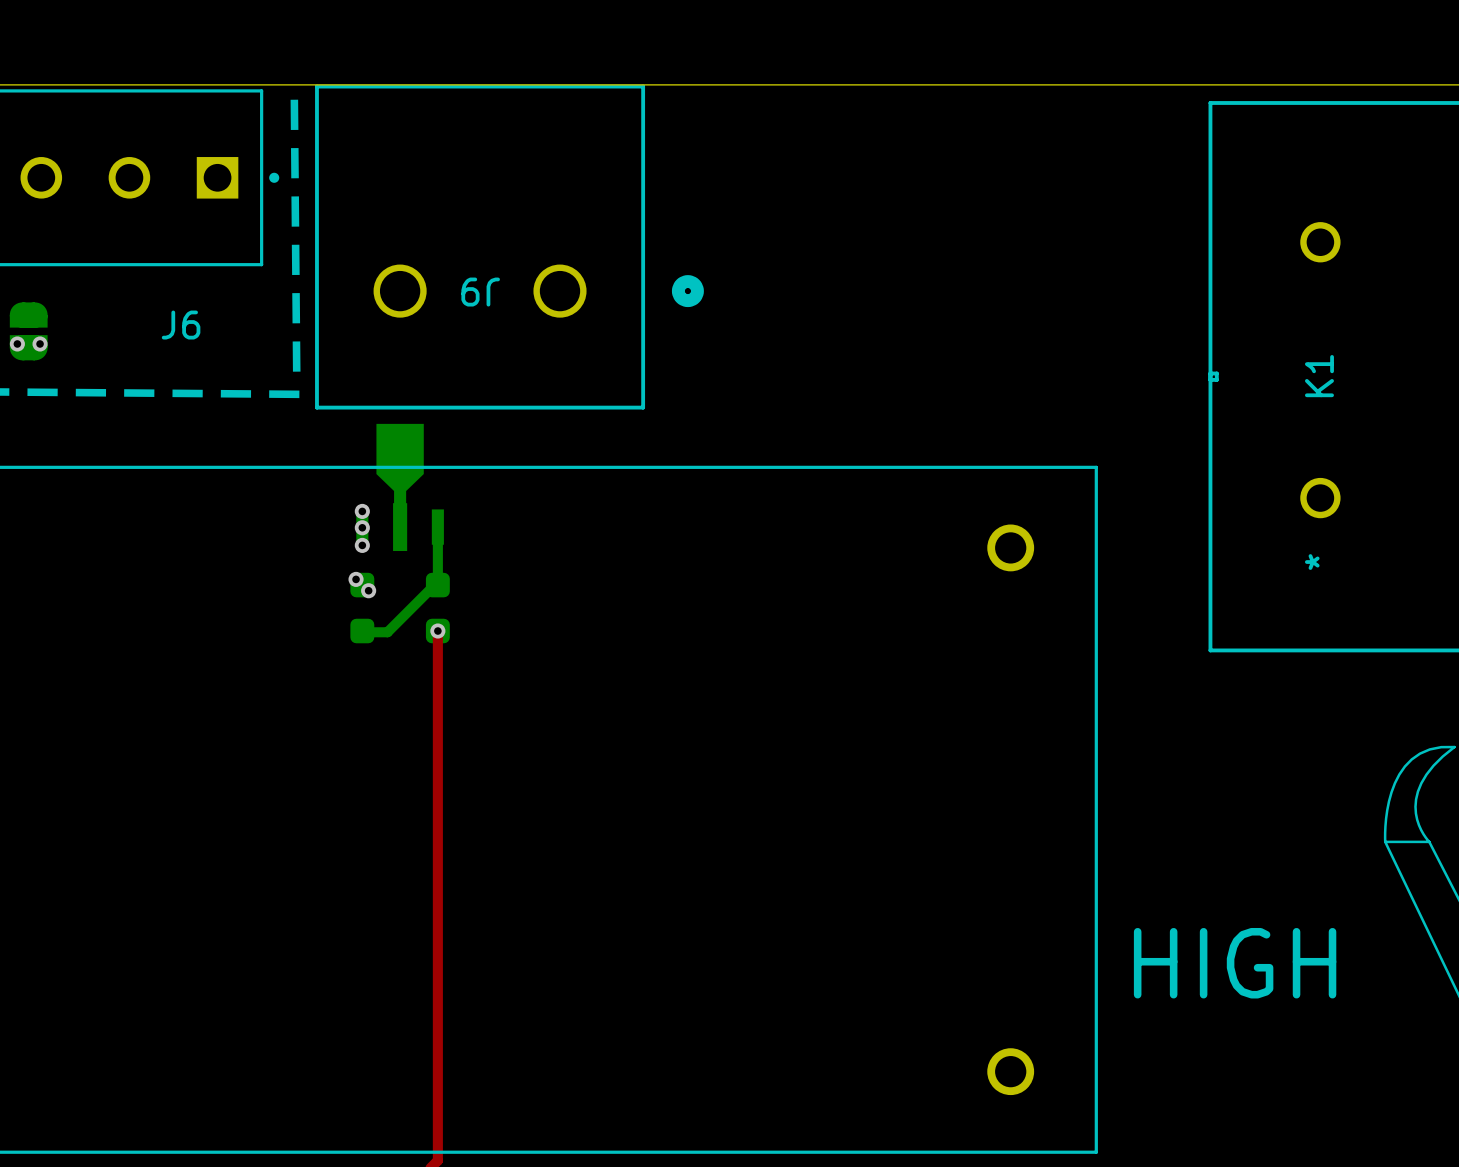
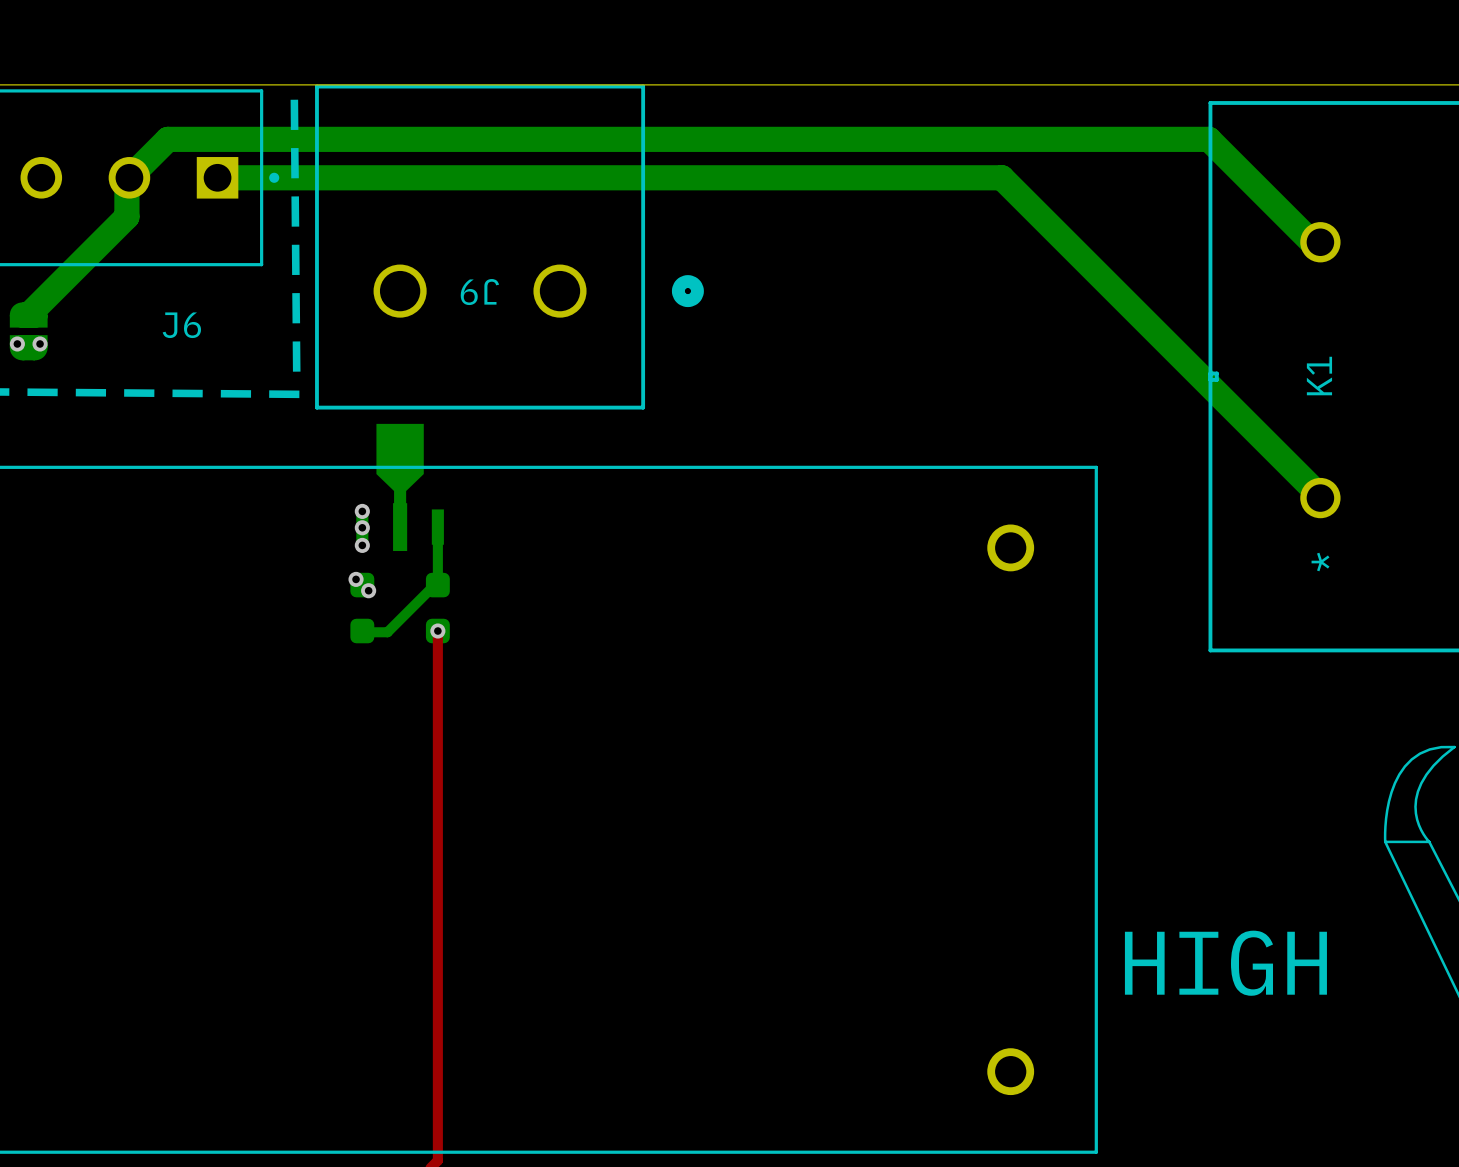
bottom track: none -> (129, 177) (167, 139) (1208, 139) (1317, 248)
bottom track: none -> (217, 177) (1001, 177) (1321, 497)
bottom track: none -> (126, 189) (126, 216) (28, 315)

